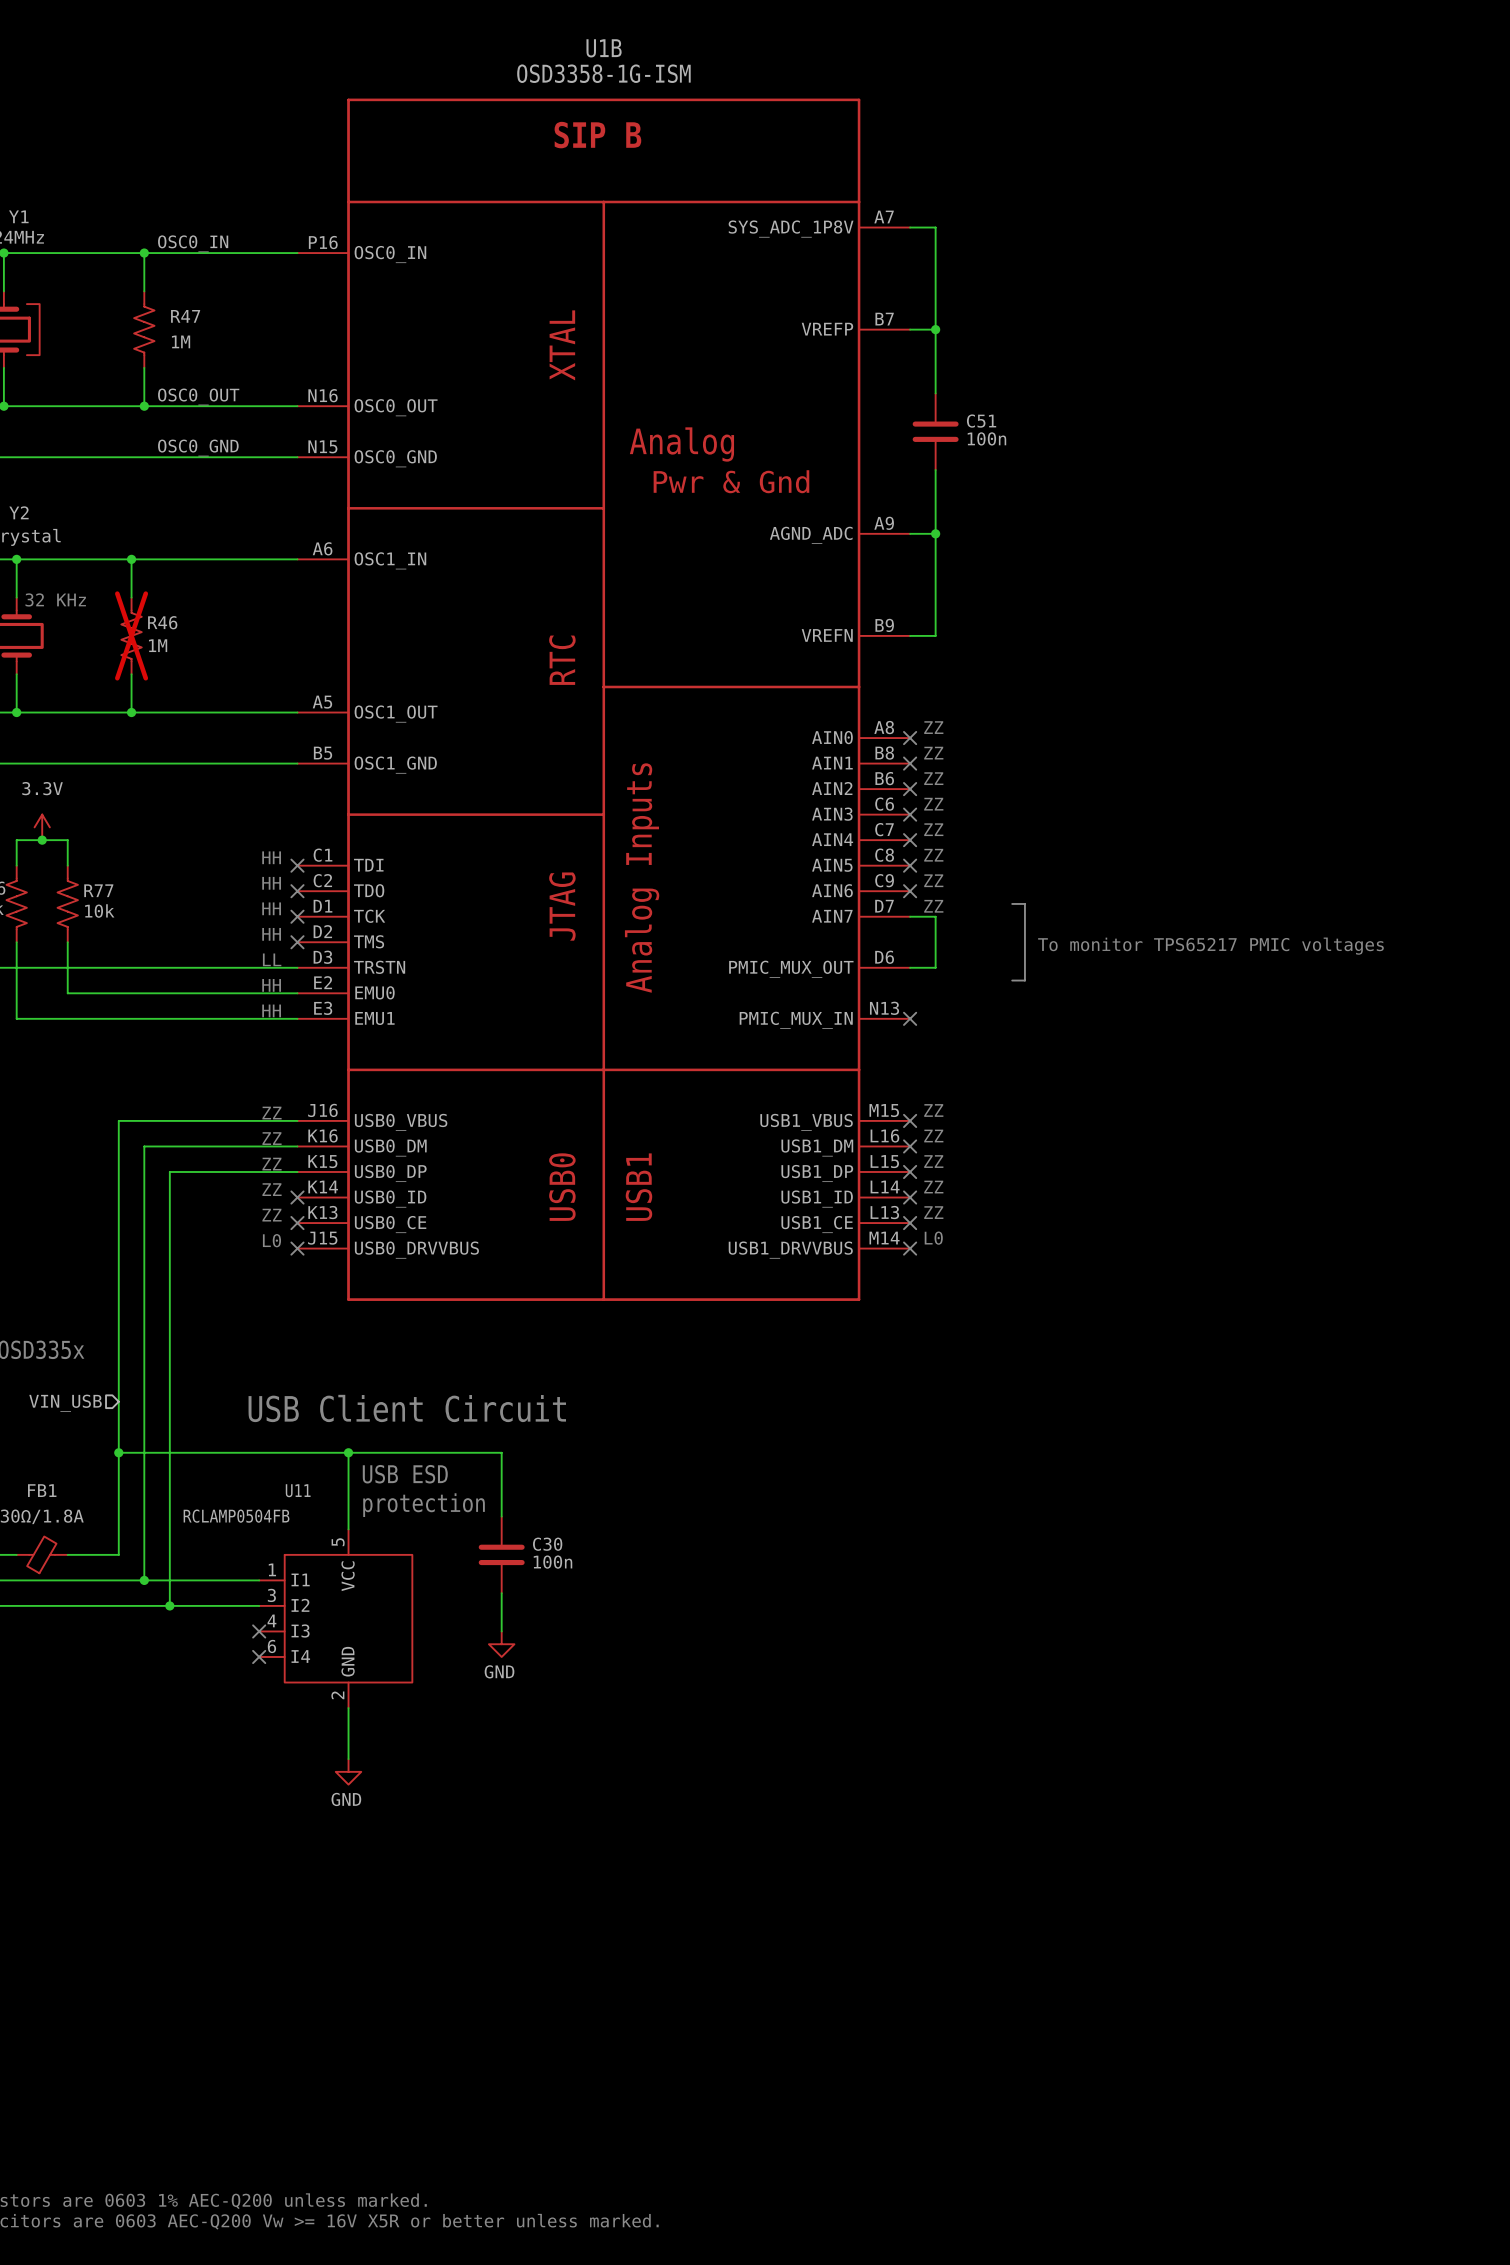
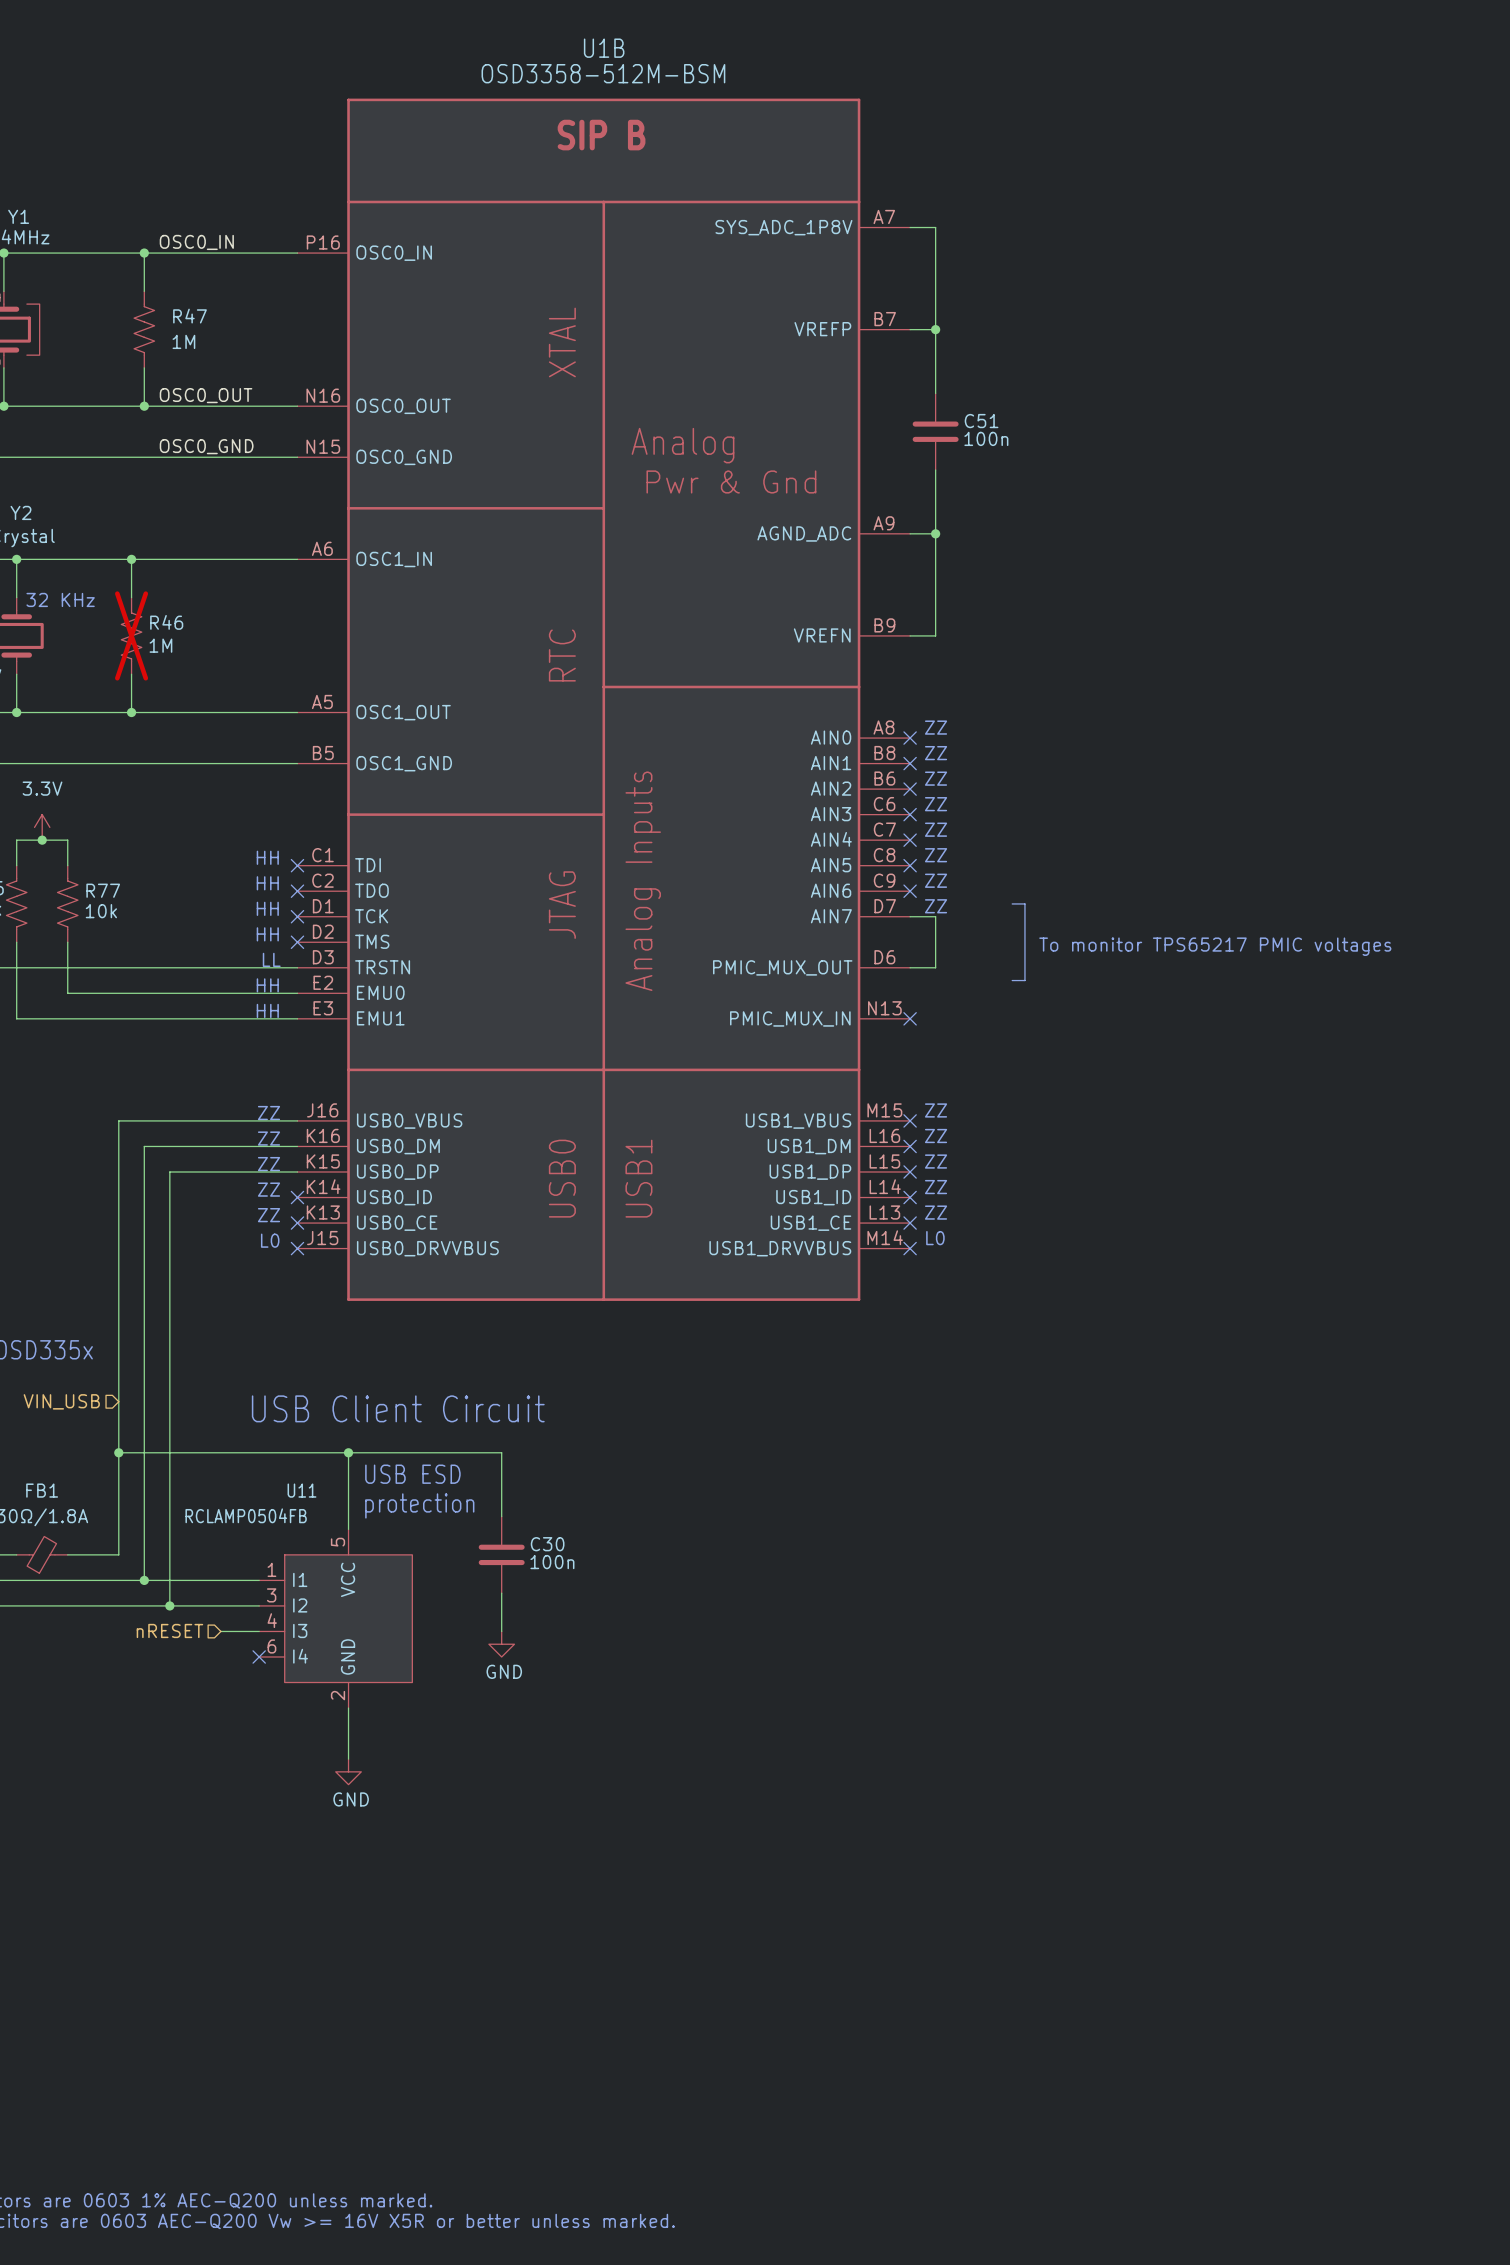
U1B value: OSD3358-1G-ISM (603, 73) -> OSD3358-512M-BSM (603, 73)
hierarchical label: none -> nRESET (169, 1630)
wire: none -> (220, 1631) (259, 1631)
no-connect mark: (259, 1631) -> none

